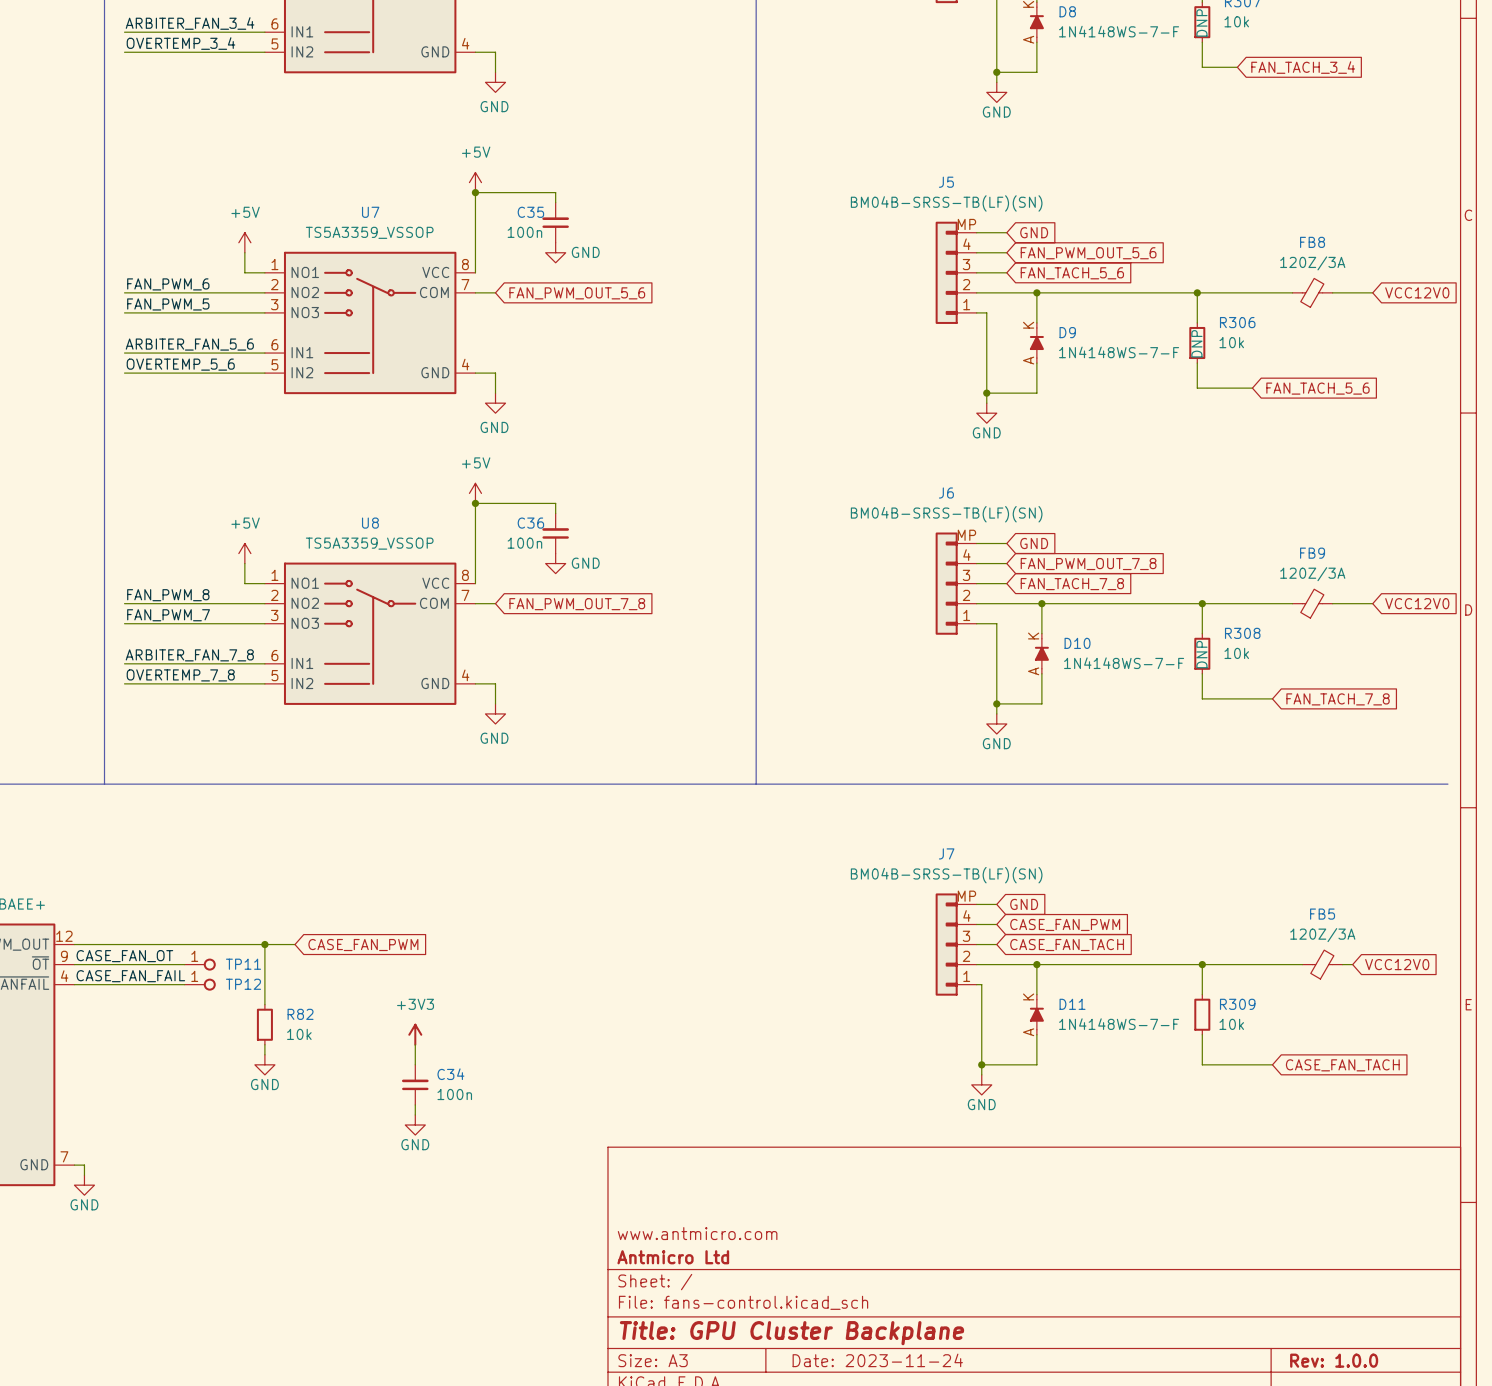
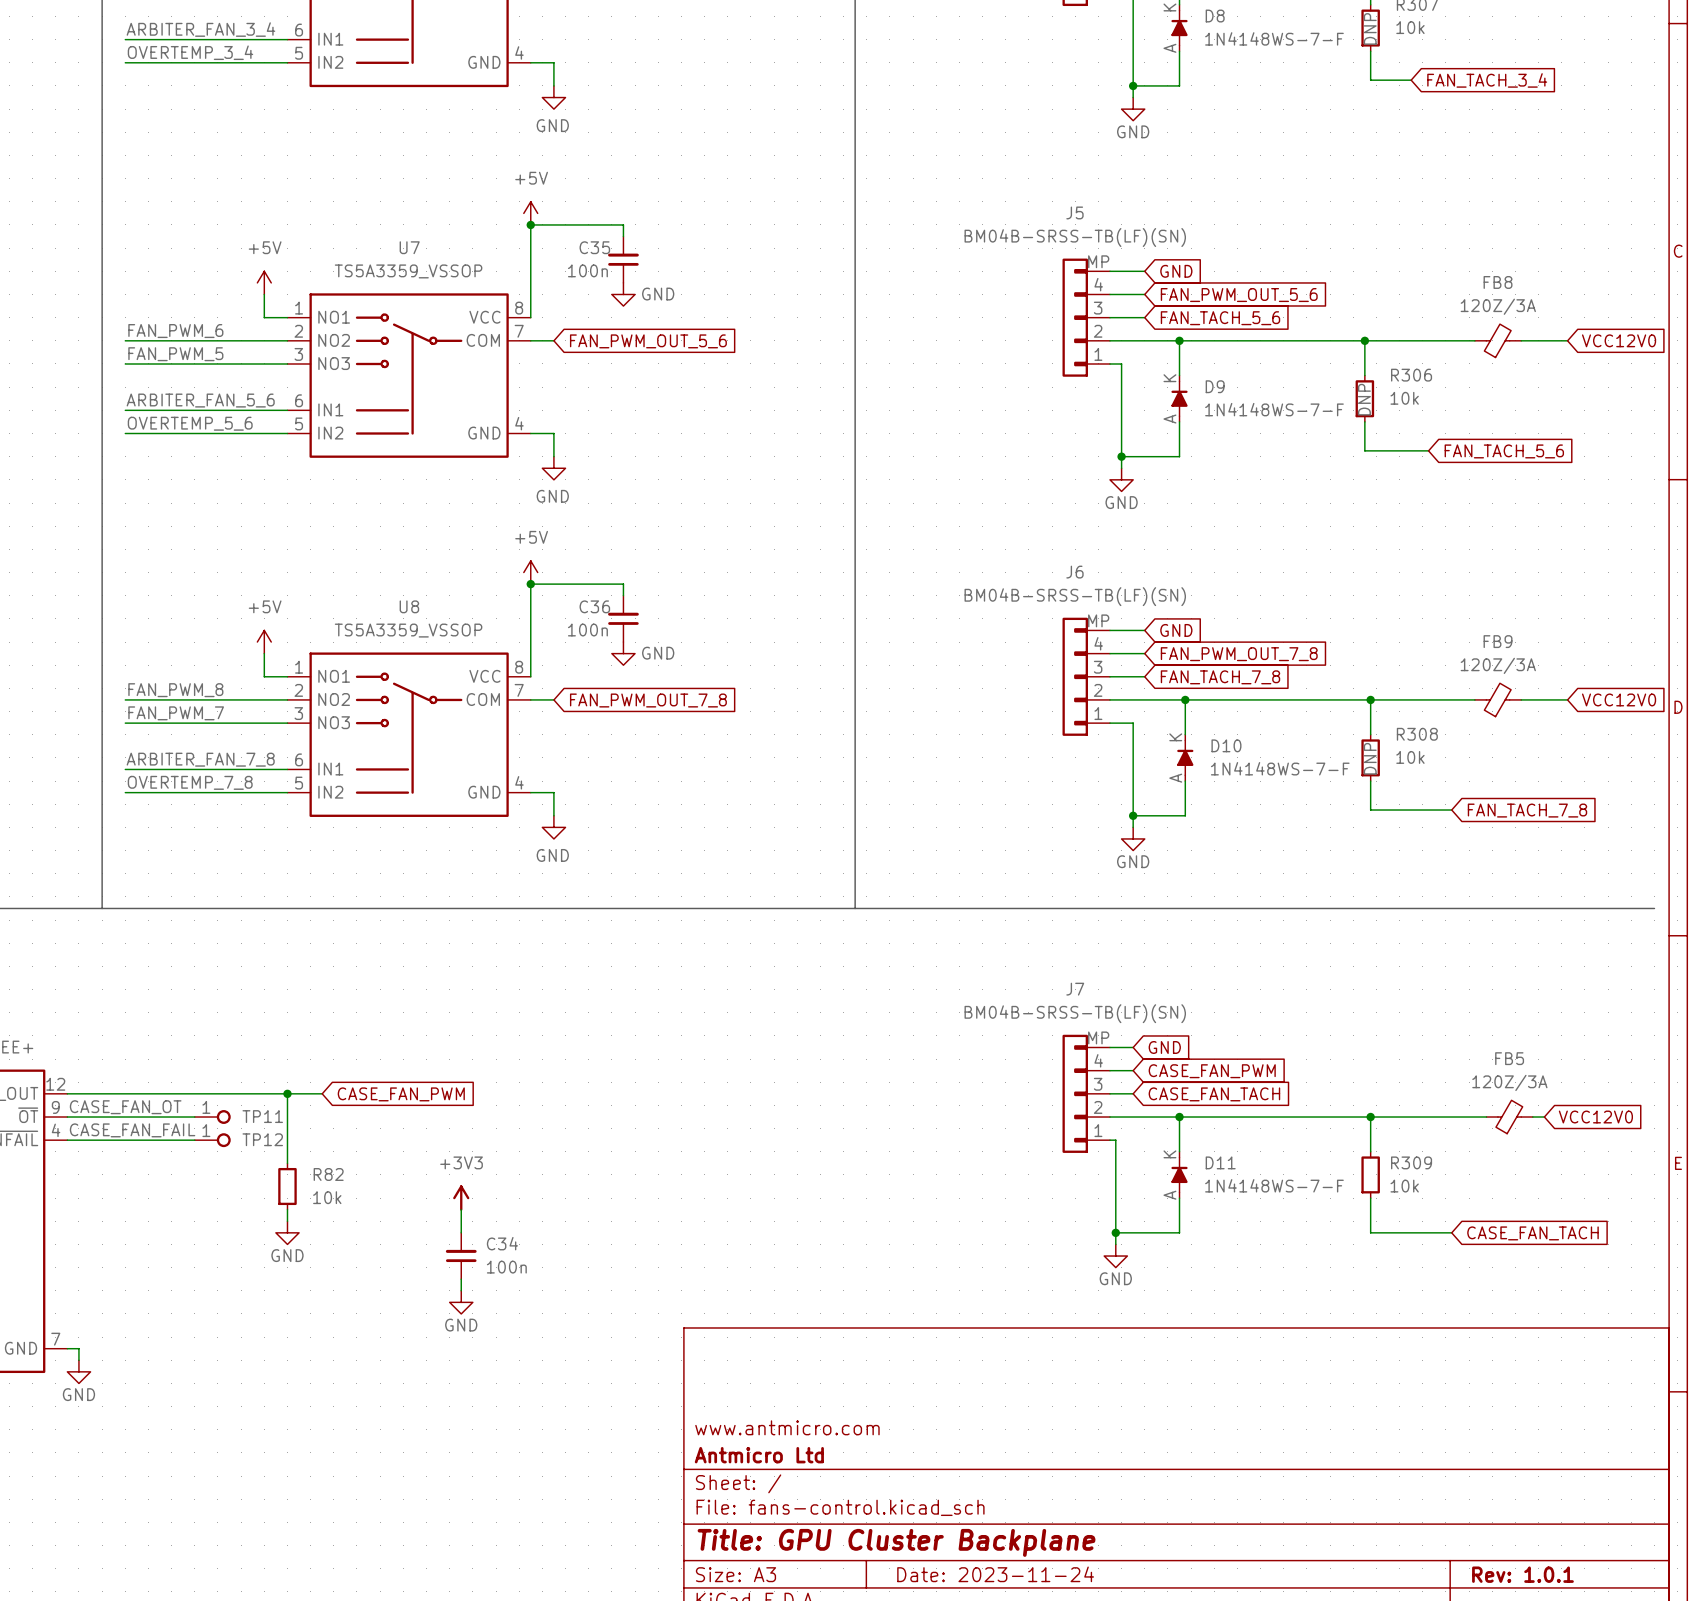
title block: Rev: 1.0.0 (1334, 1360) -> Rev: 1.0.1 (1522, 1574)

